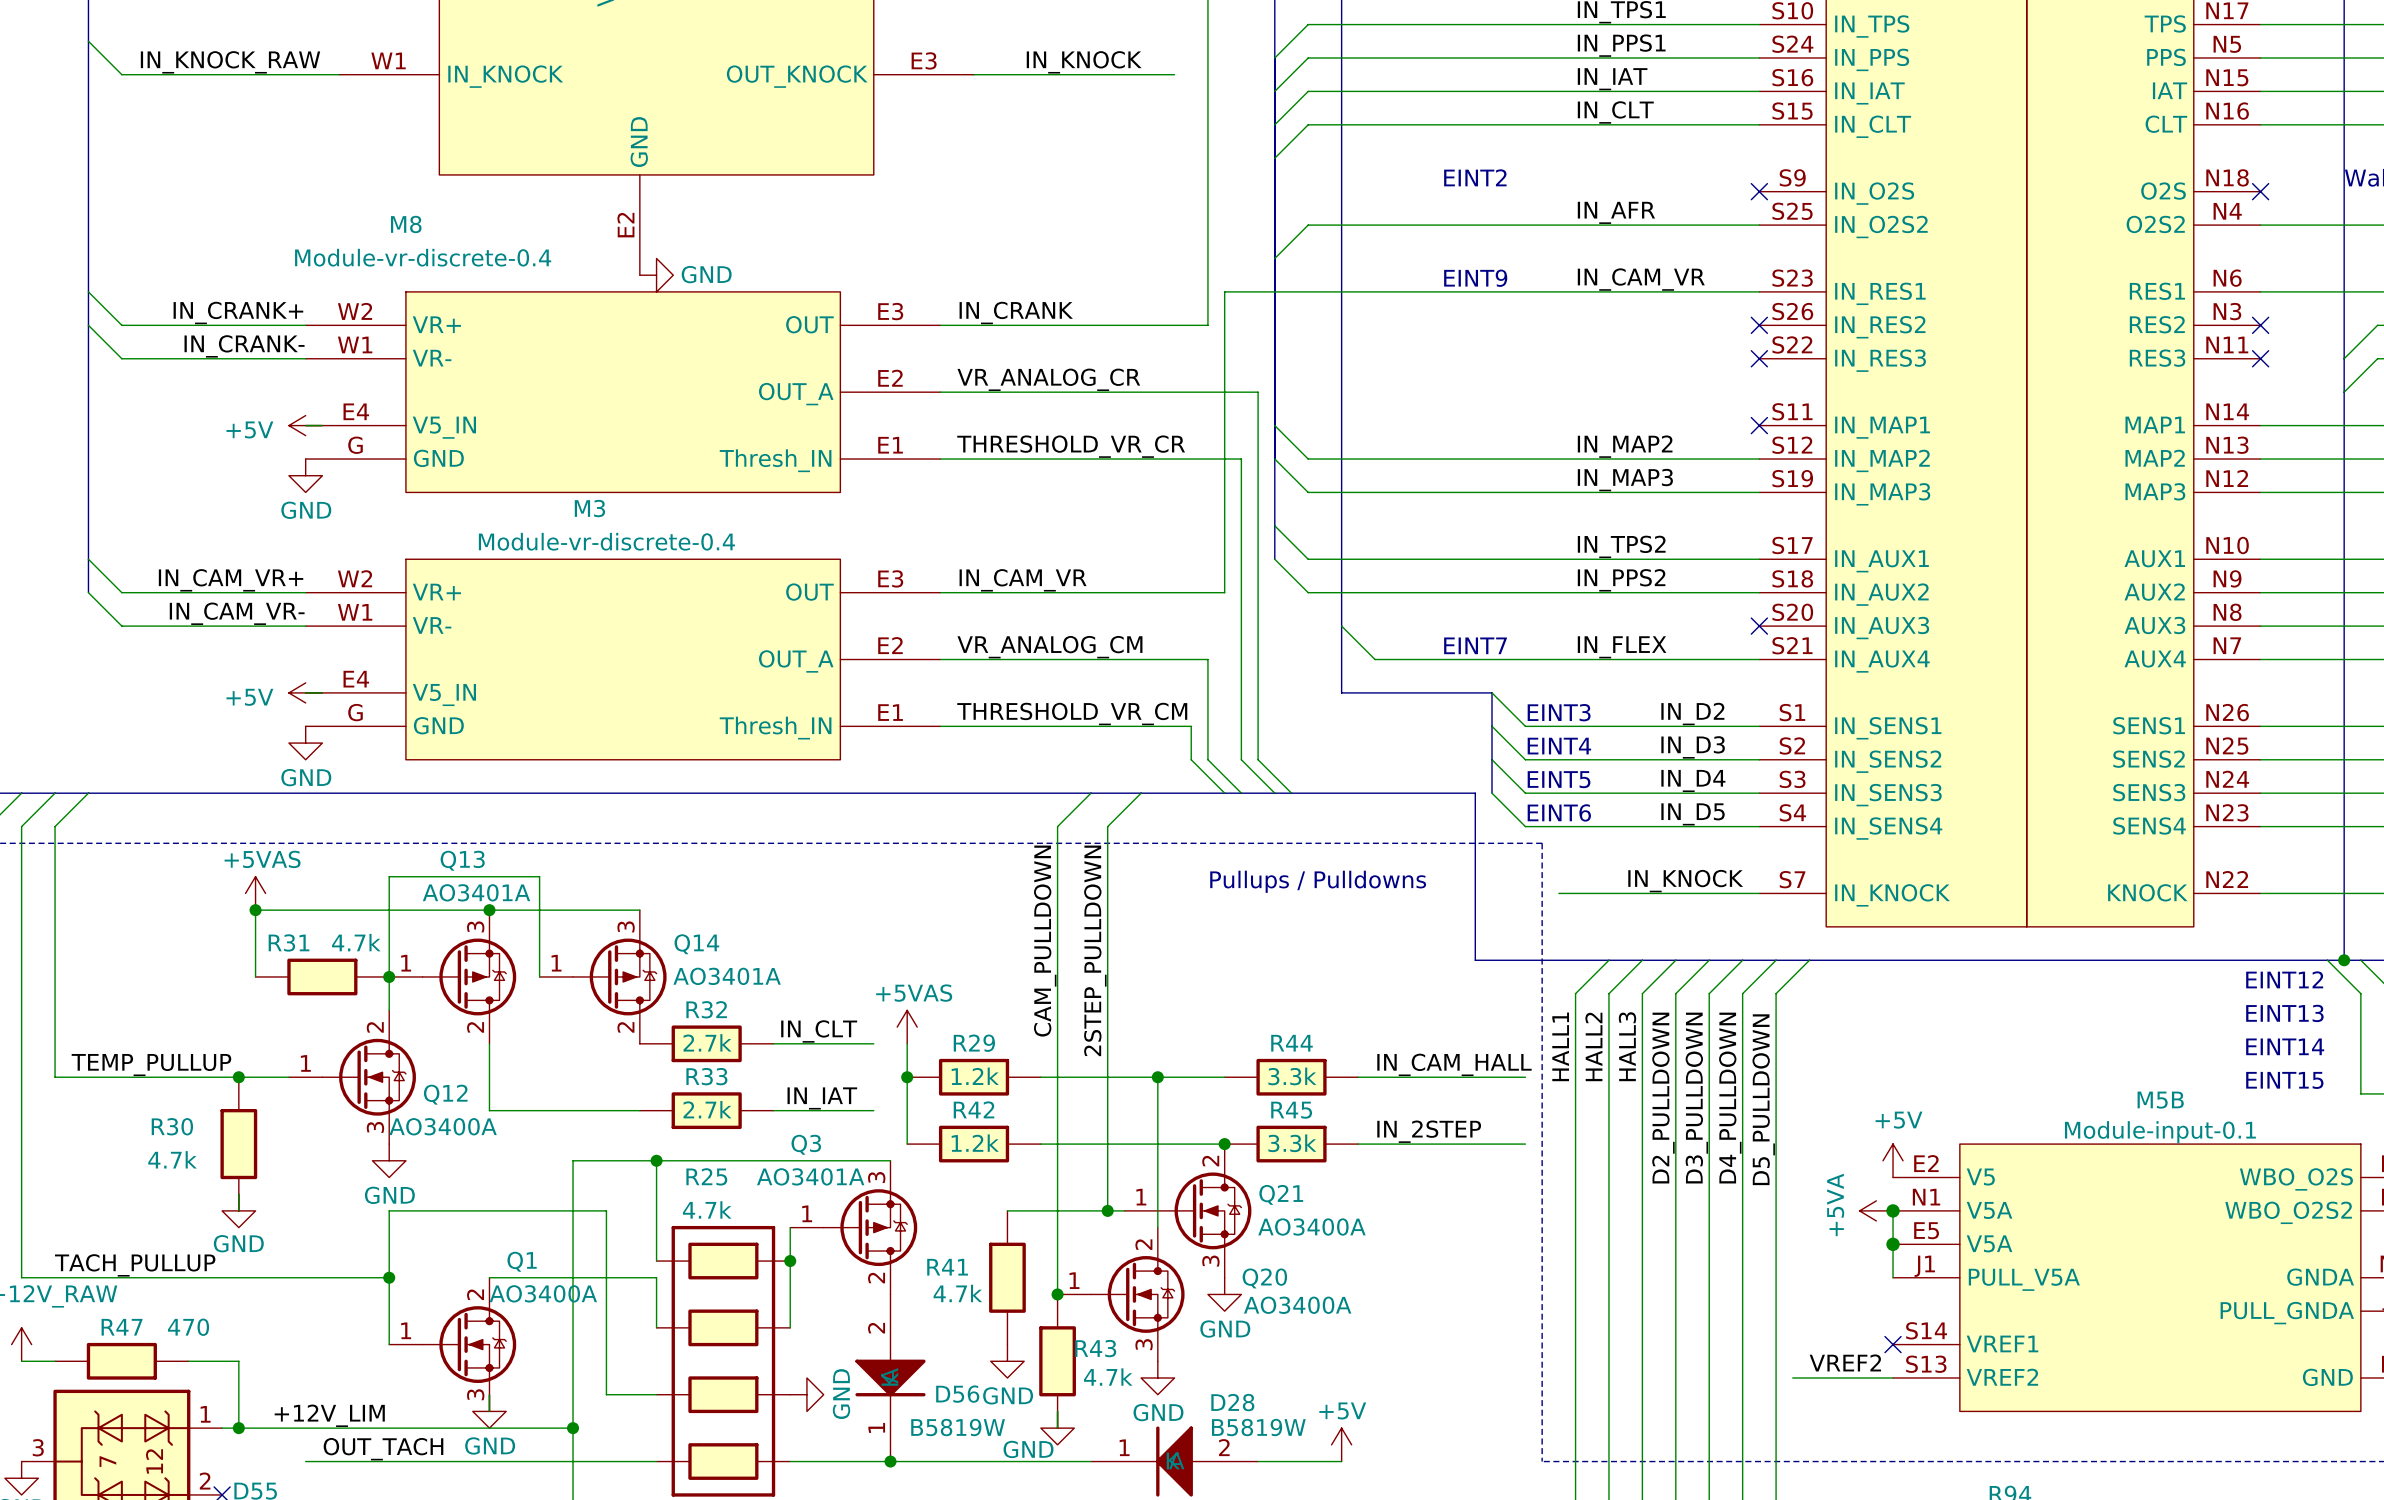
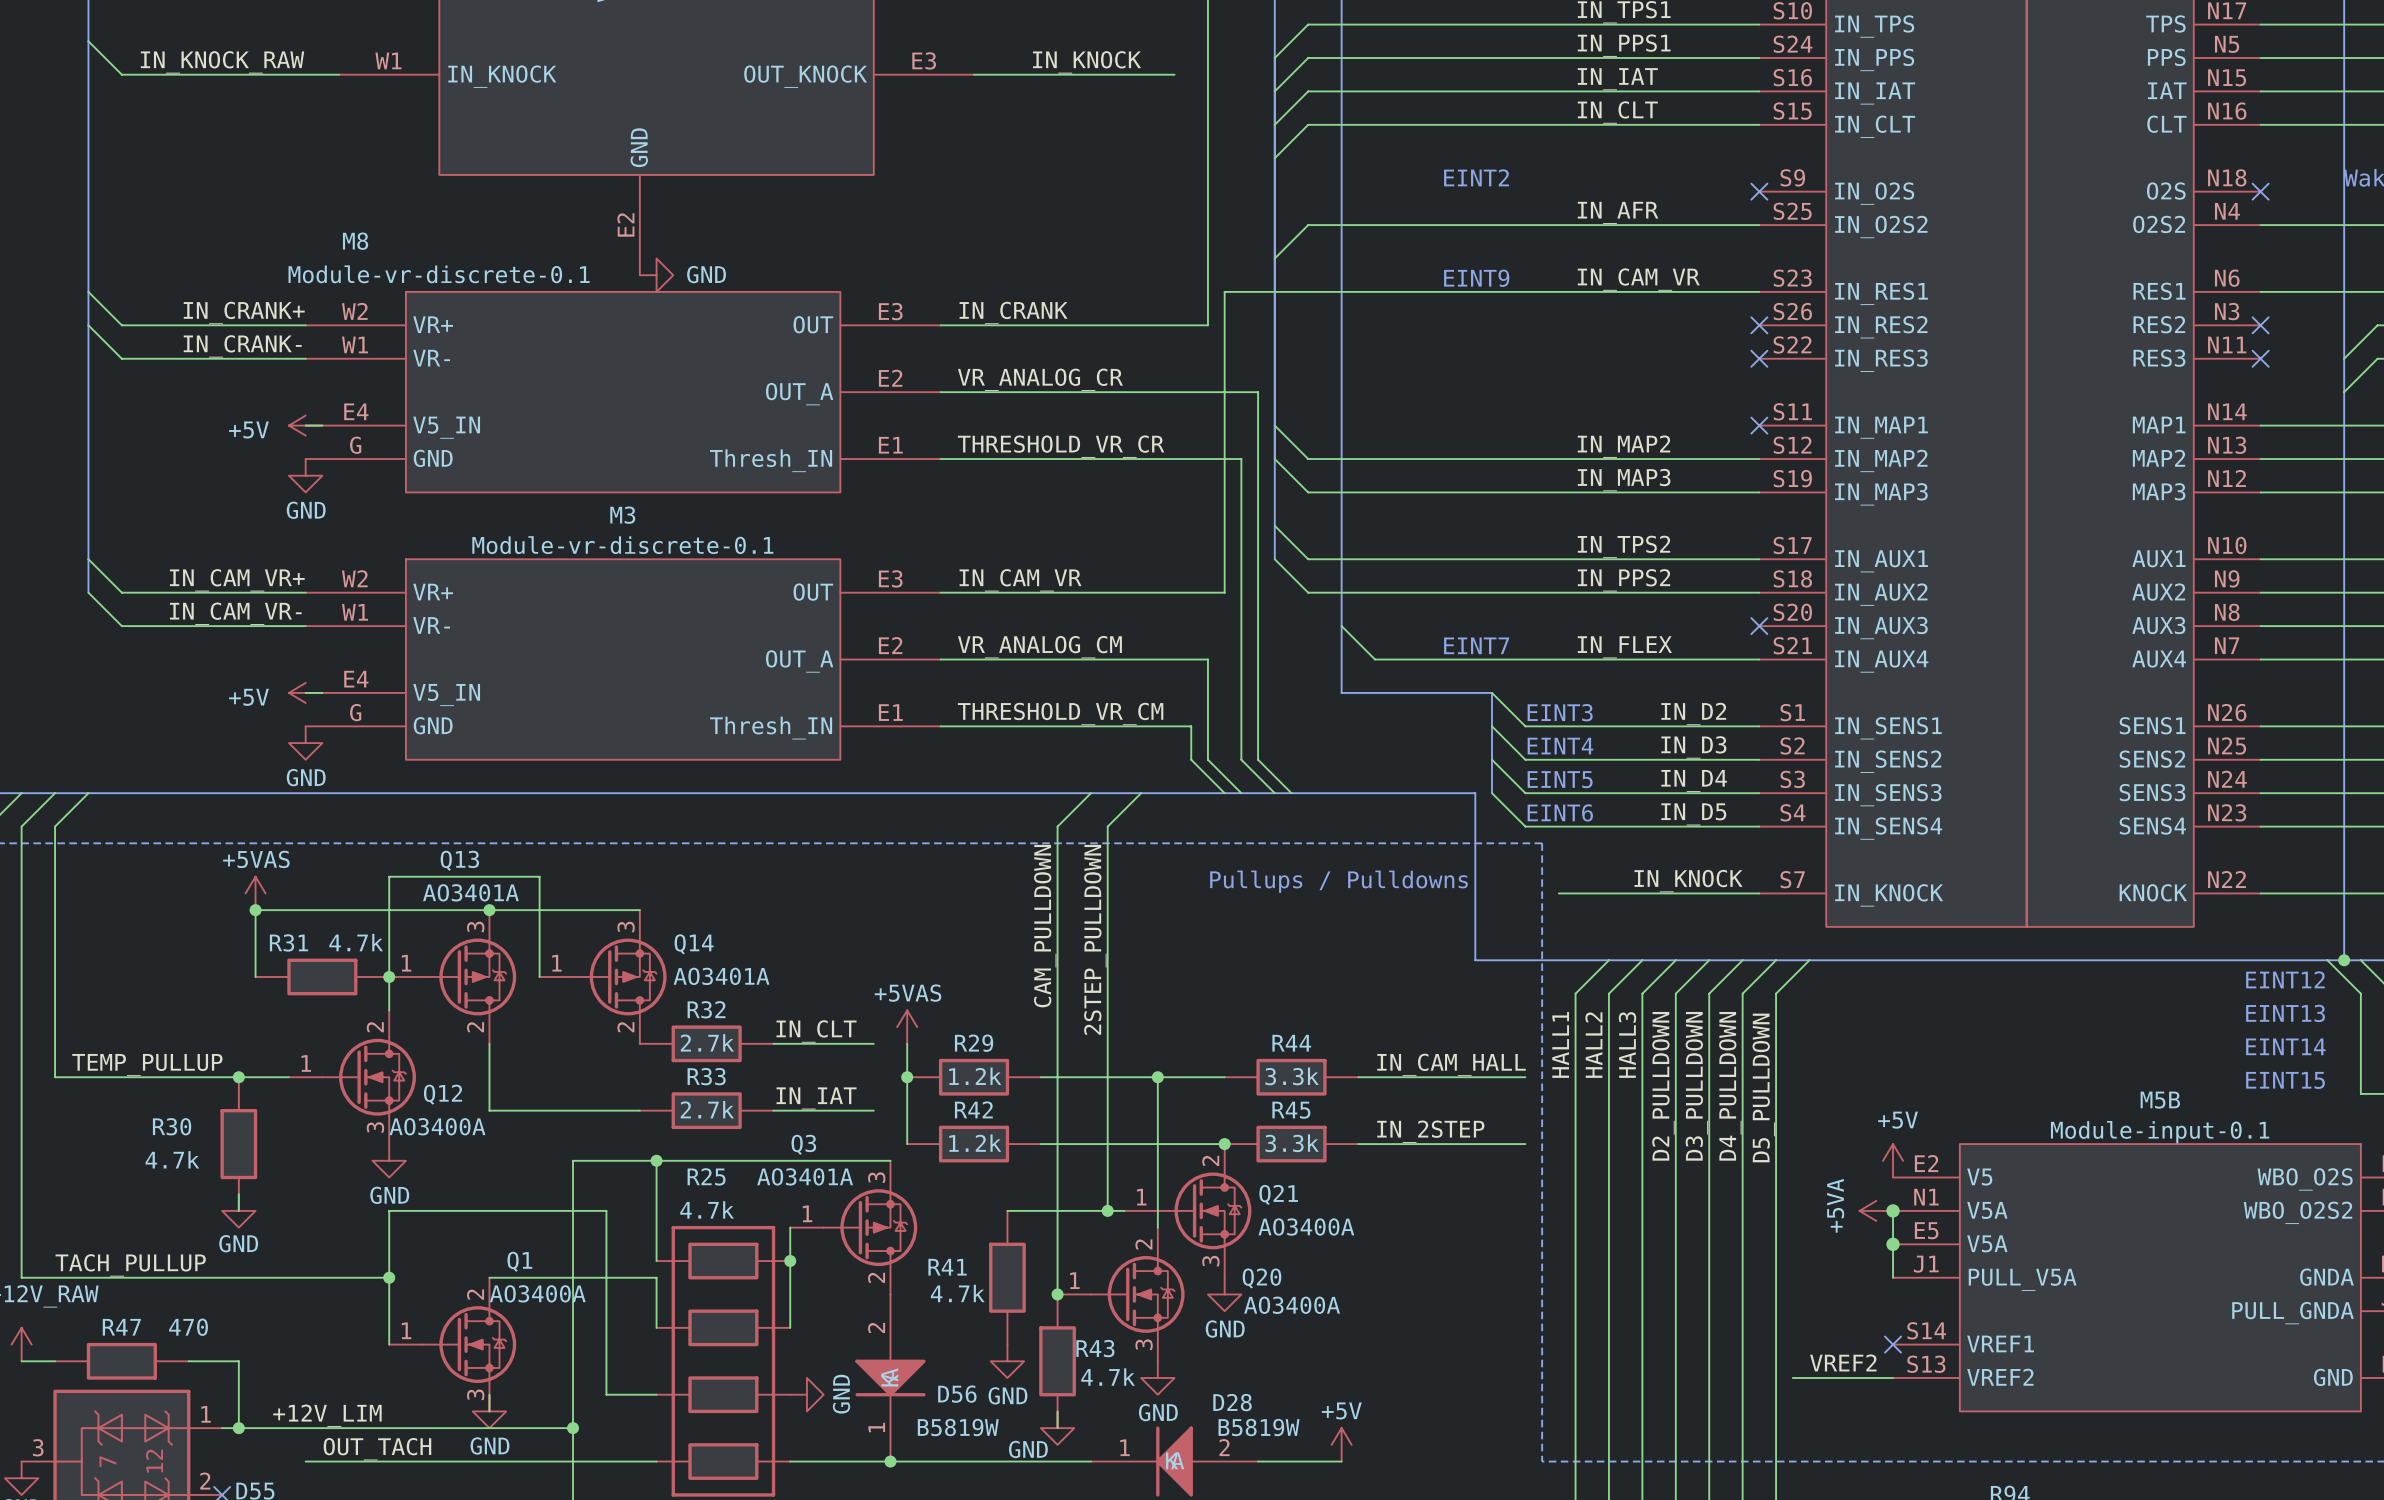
M8 name position: M8 (406, 224) -> M8 (355, 241)
M8 value: Module-vr-discrete-0.4 (423, 257) -> Module-vr-discrete-0.1 (439, 274)
M3 name position: M3 (589, 508) -> M3 (622, 515)
M3 value: Module-vr-discrete-0.4 (606, 541) -> Module-vr-discrete-0.1 (622, 545)

